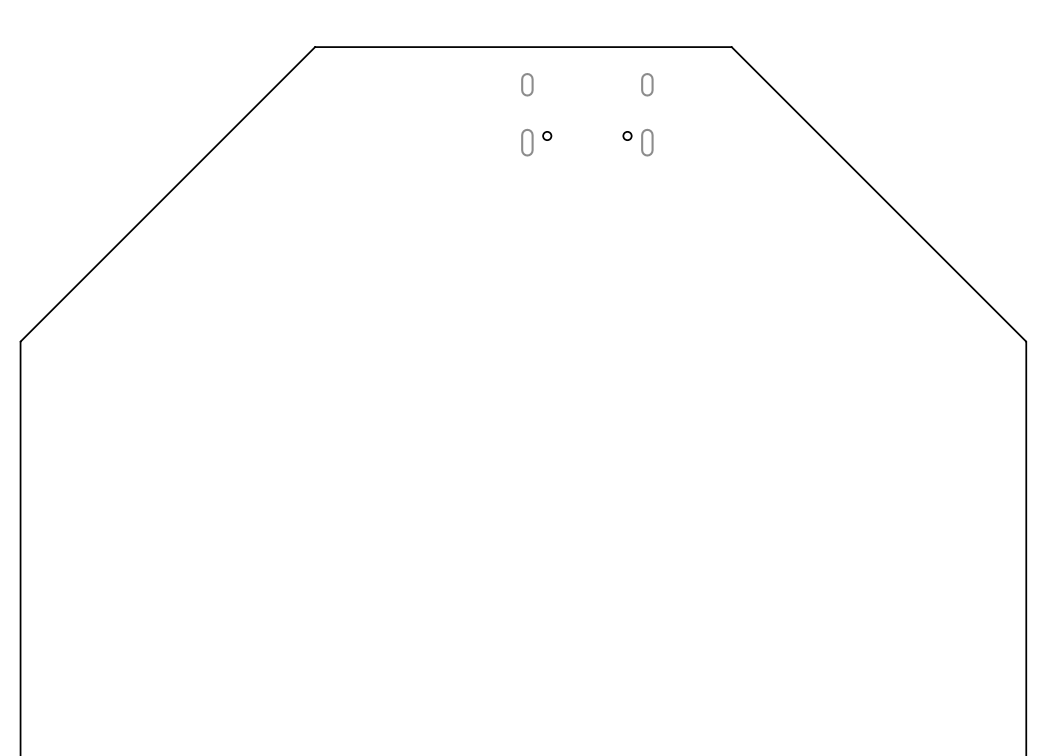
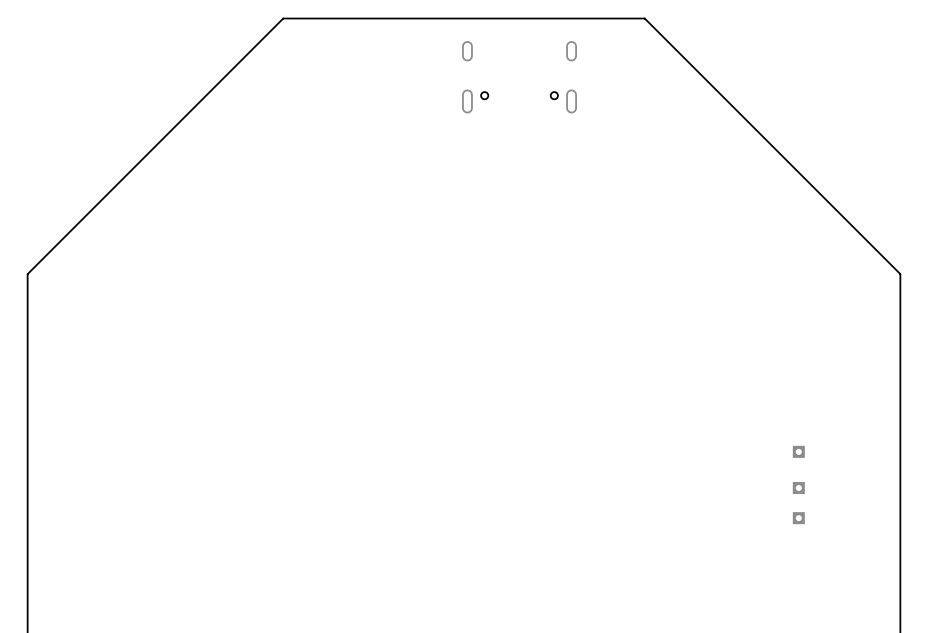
part: none -> (798, 451)
part: none -> (798, 488)
part: none -> (798, 518)

